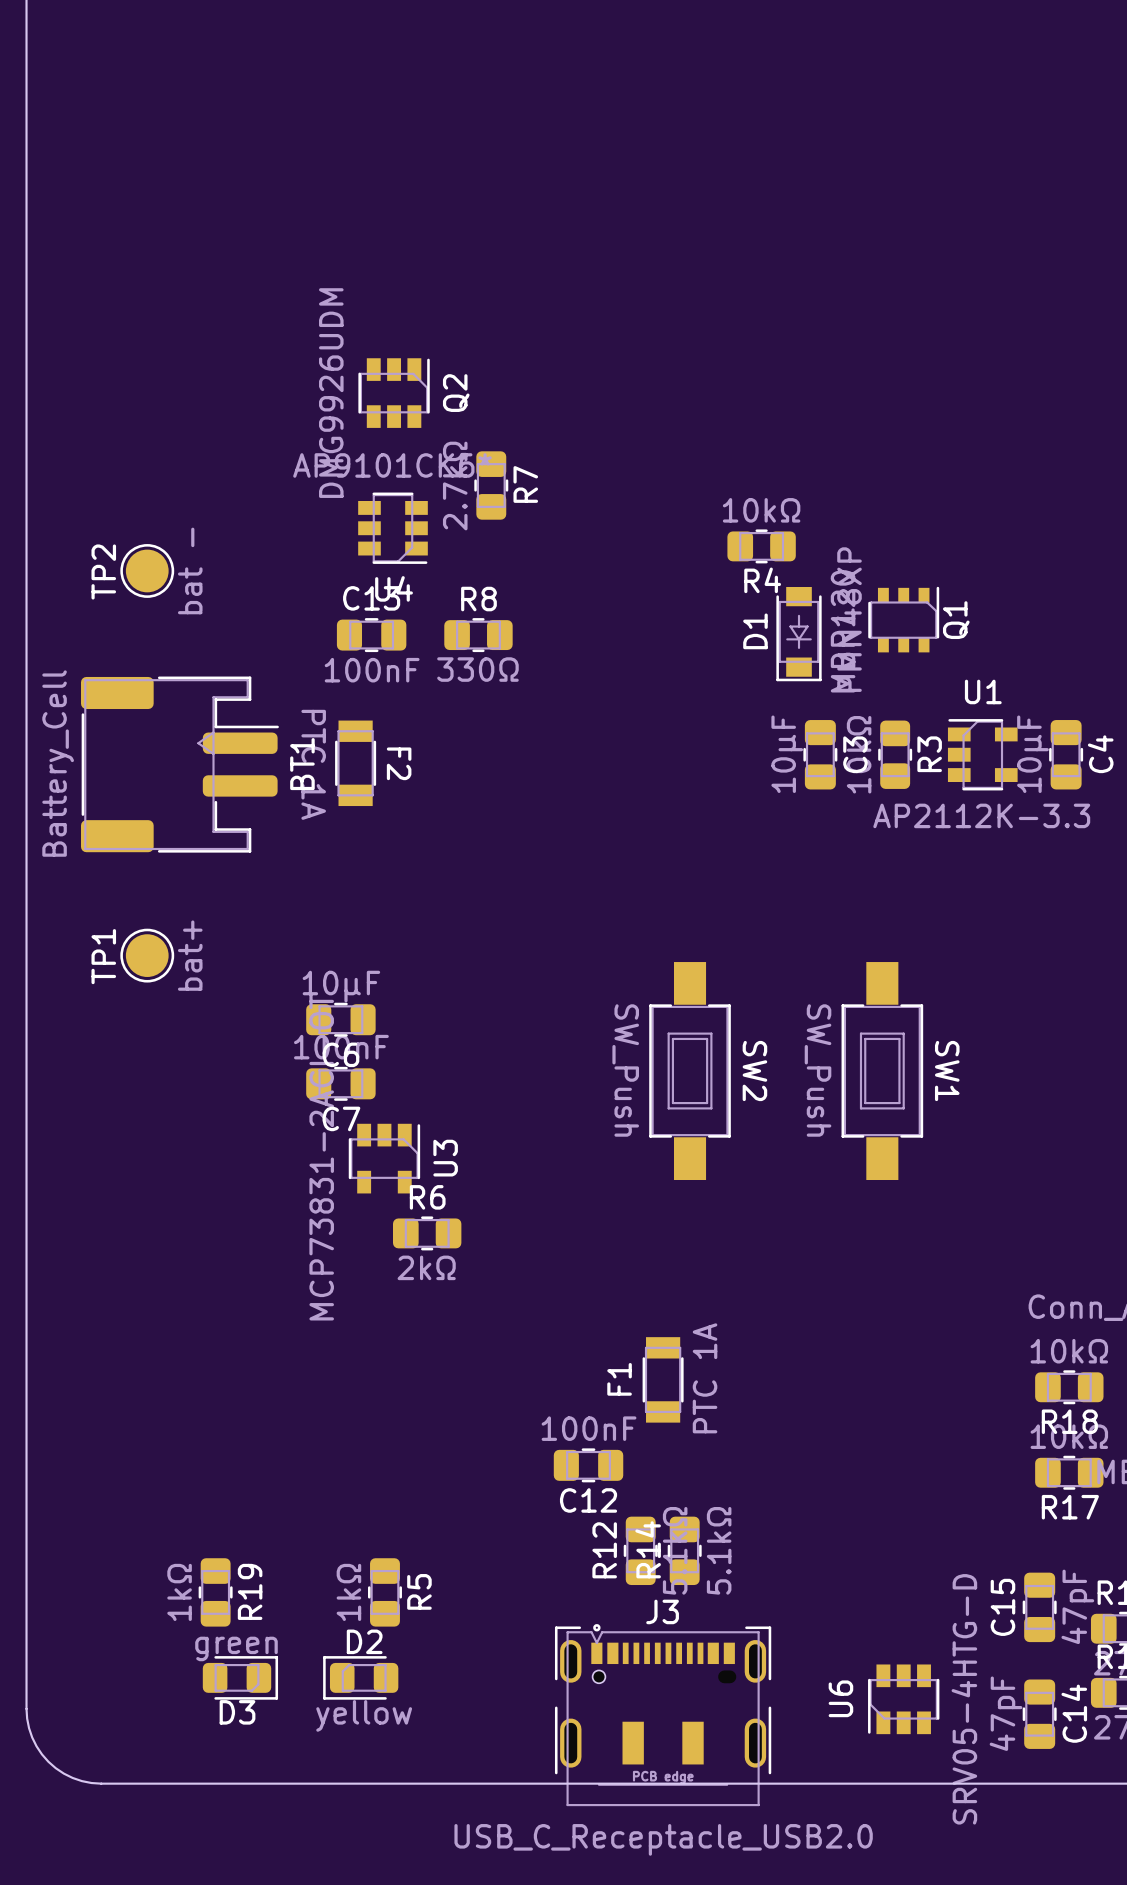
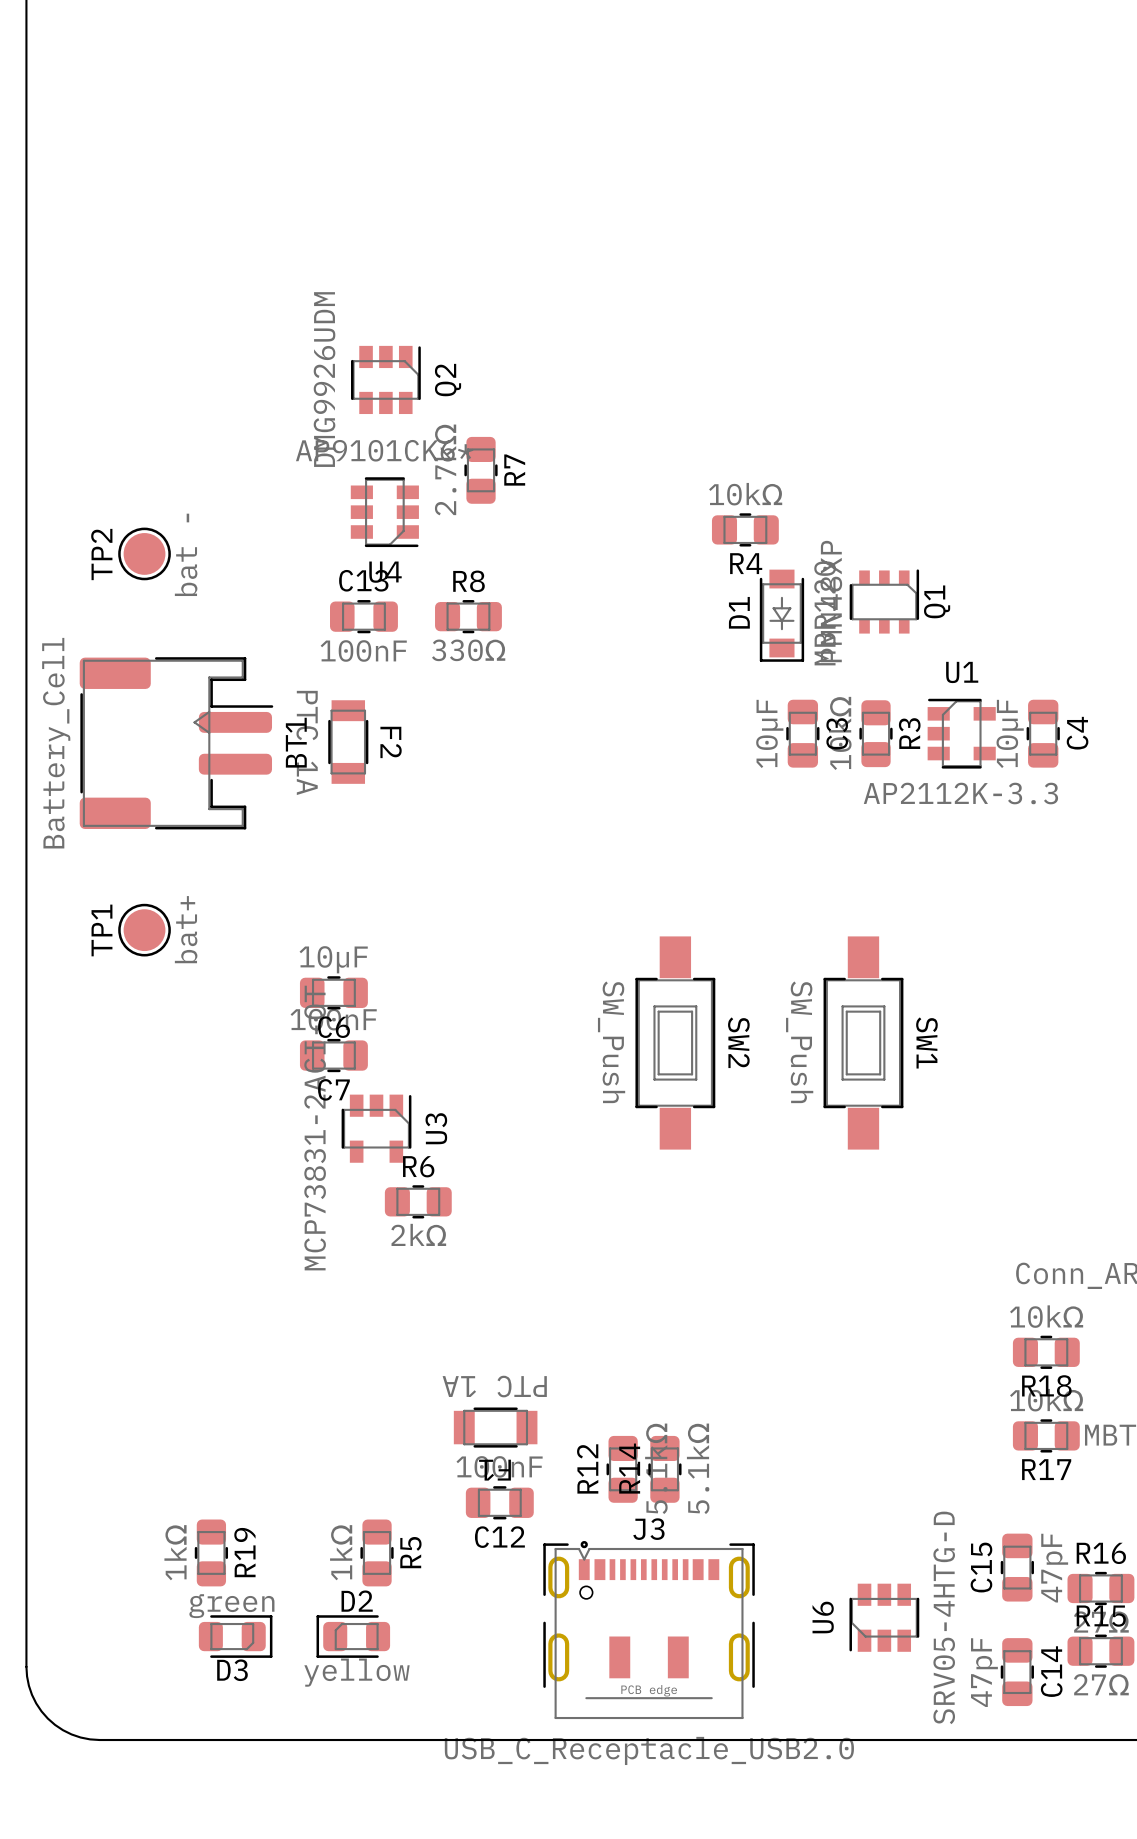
F1 value position: PTC 1A (705, 1378) -> PTC 1A (494, 1386)
F1 name position: F1 (619, 1379) -> F1 (494, 1470)
F1 rotation: 0° (663, 1379) -> 90° clockwise (495, 1427)
F1 position: (663, 1379) -> (495, 1427)
C12 position: (588, 1465) -> (499, 1502)
R12 position: (640, 1550) -> (623, 1469)
R14 position: (684, 1550) -> (664, 1469)
U6 position: (903, 1699) -> (884, 1617)
J3 position: (663, 1715) -> (649, 1630)

